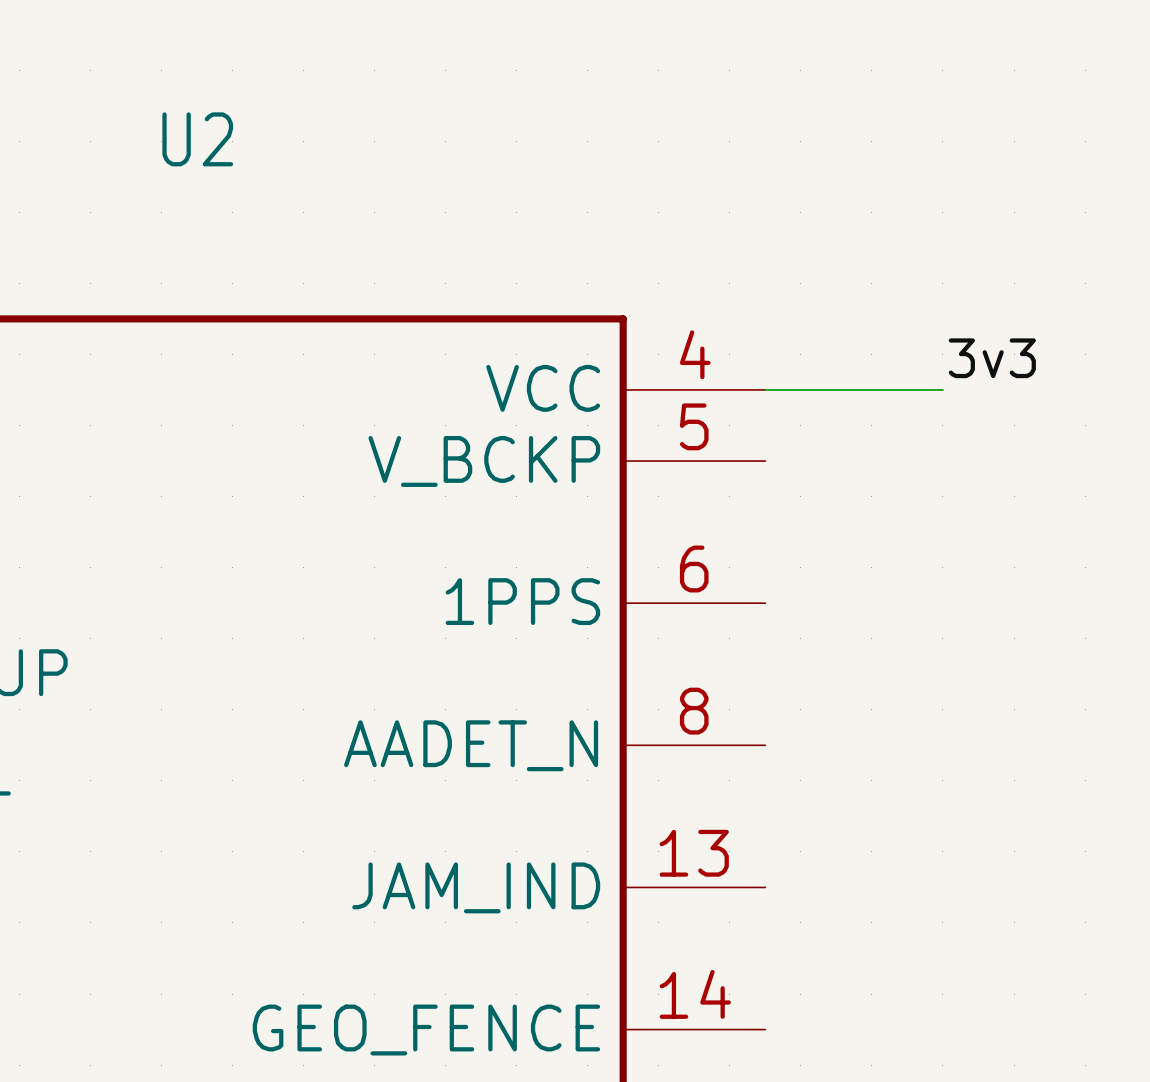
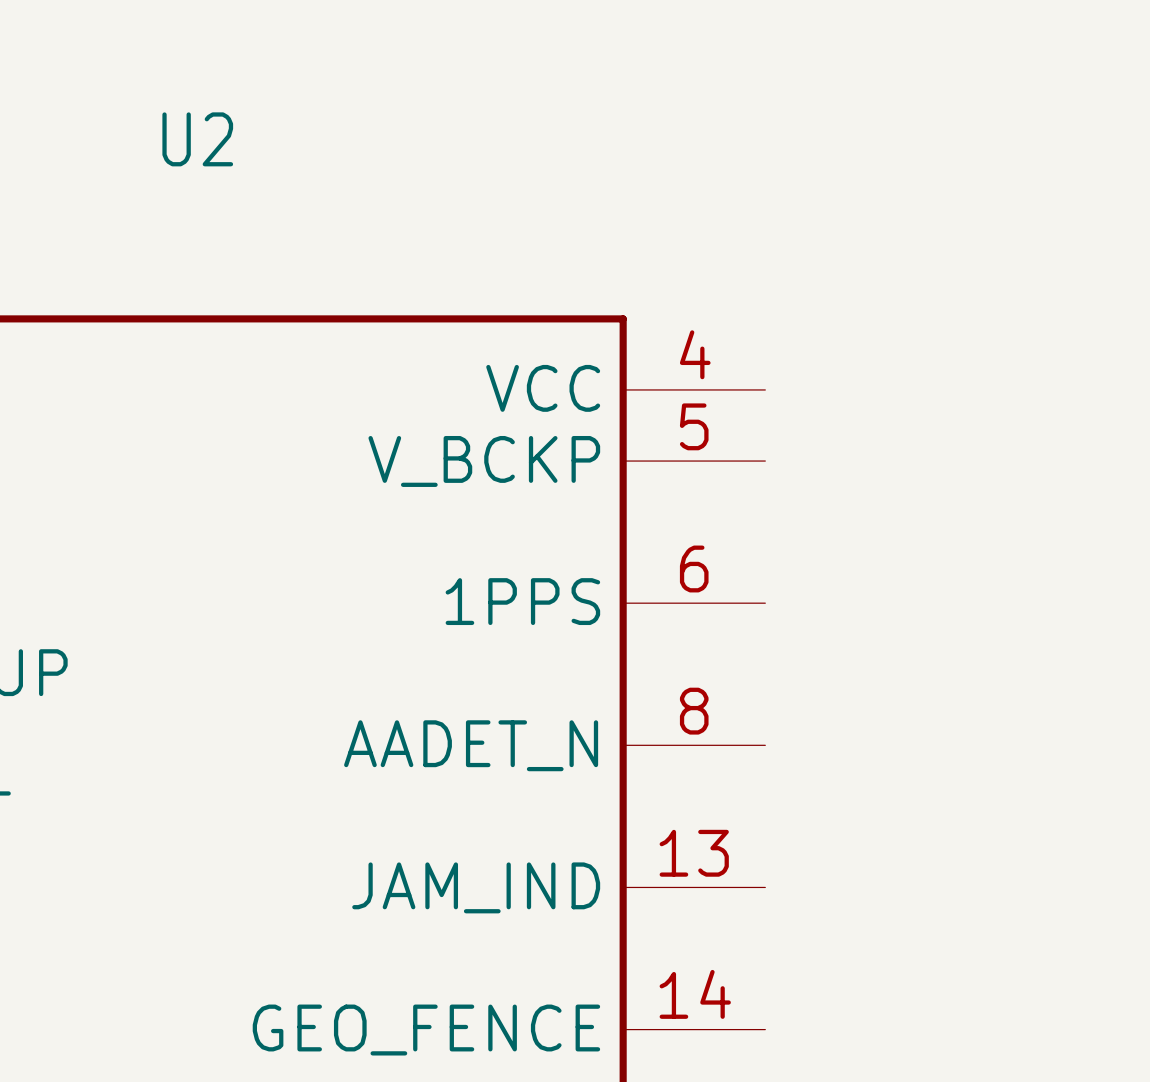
label: 3v3 (992, 358) -> none
wire: (765, 389) (942, 389) -> none

